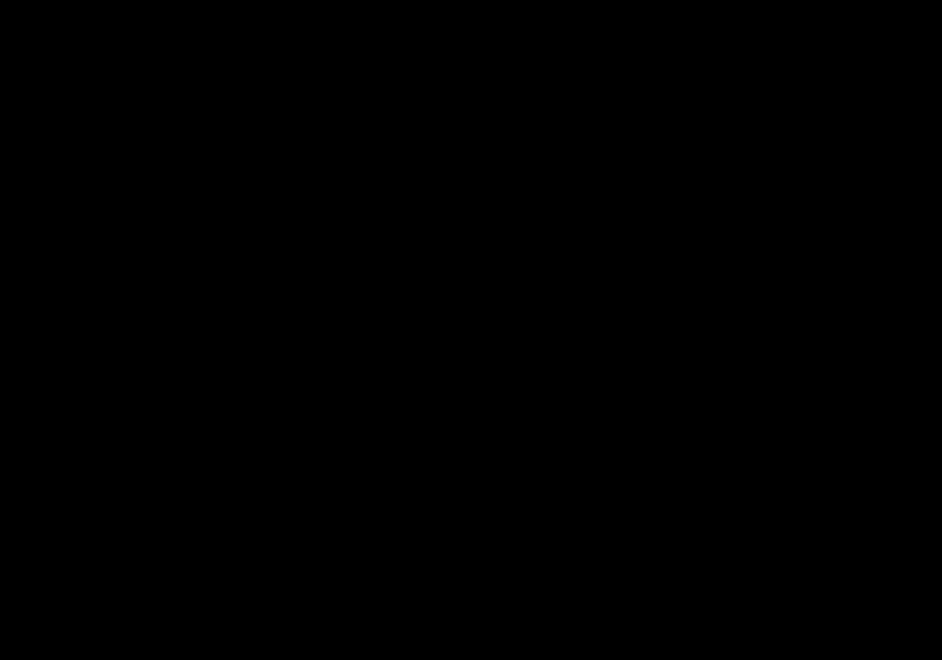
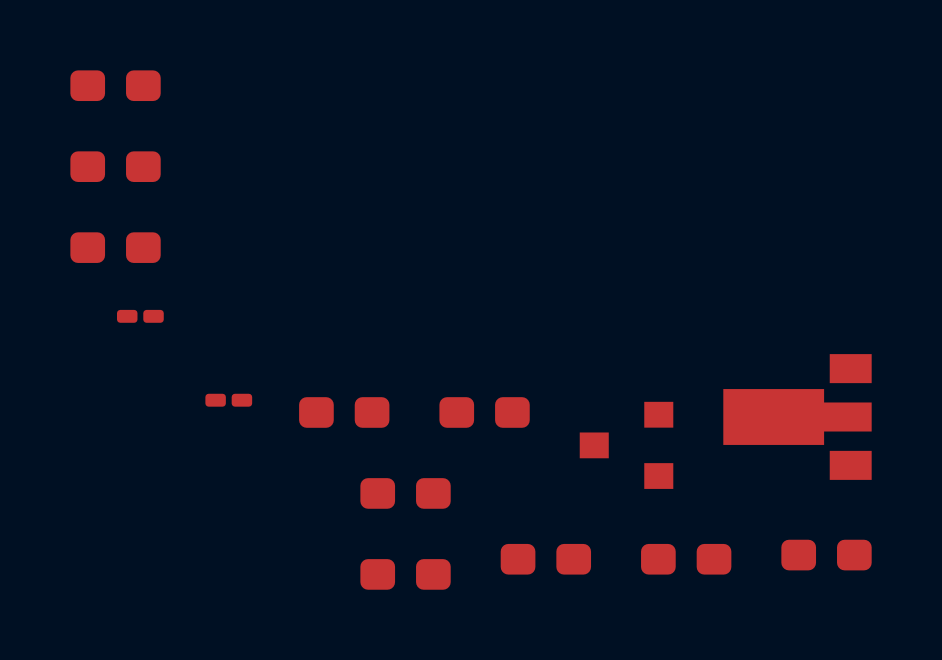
part: none -> (115, 85)
part: none -> (115, 166)
part: none -> (115, 247)
part: none -> (140, 316)
part: none -> (228, 400)
part: none -> (344, 412)
part: none -> (484, 412)
part: none -> (797, 417)
part: none -> (626, 445)
part: none -> (405, 493)
part: none -> (826, 555)
part: none -> (545, 559)
part: none -> (686, 559)
part: none -> (405, 574)

